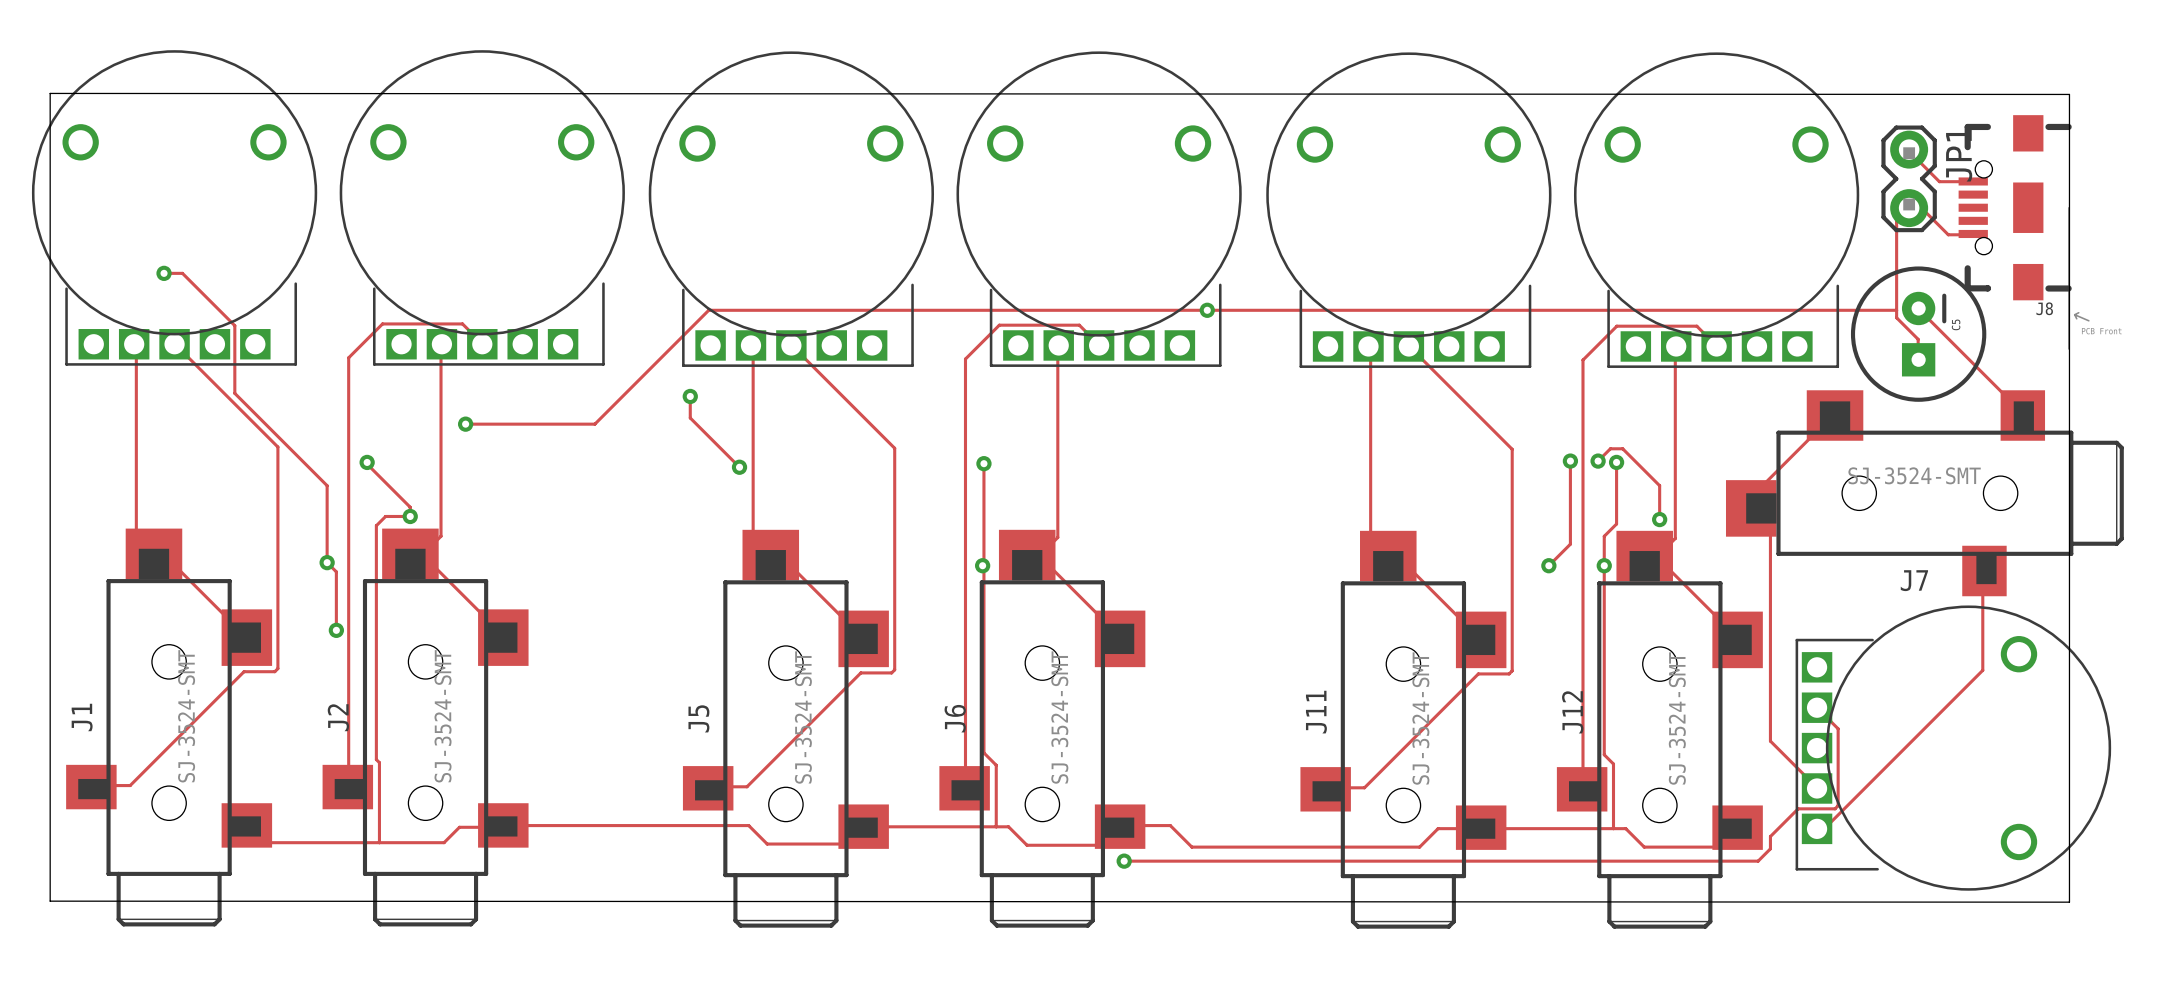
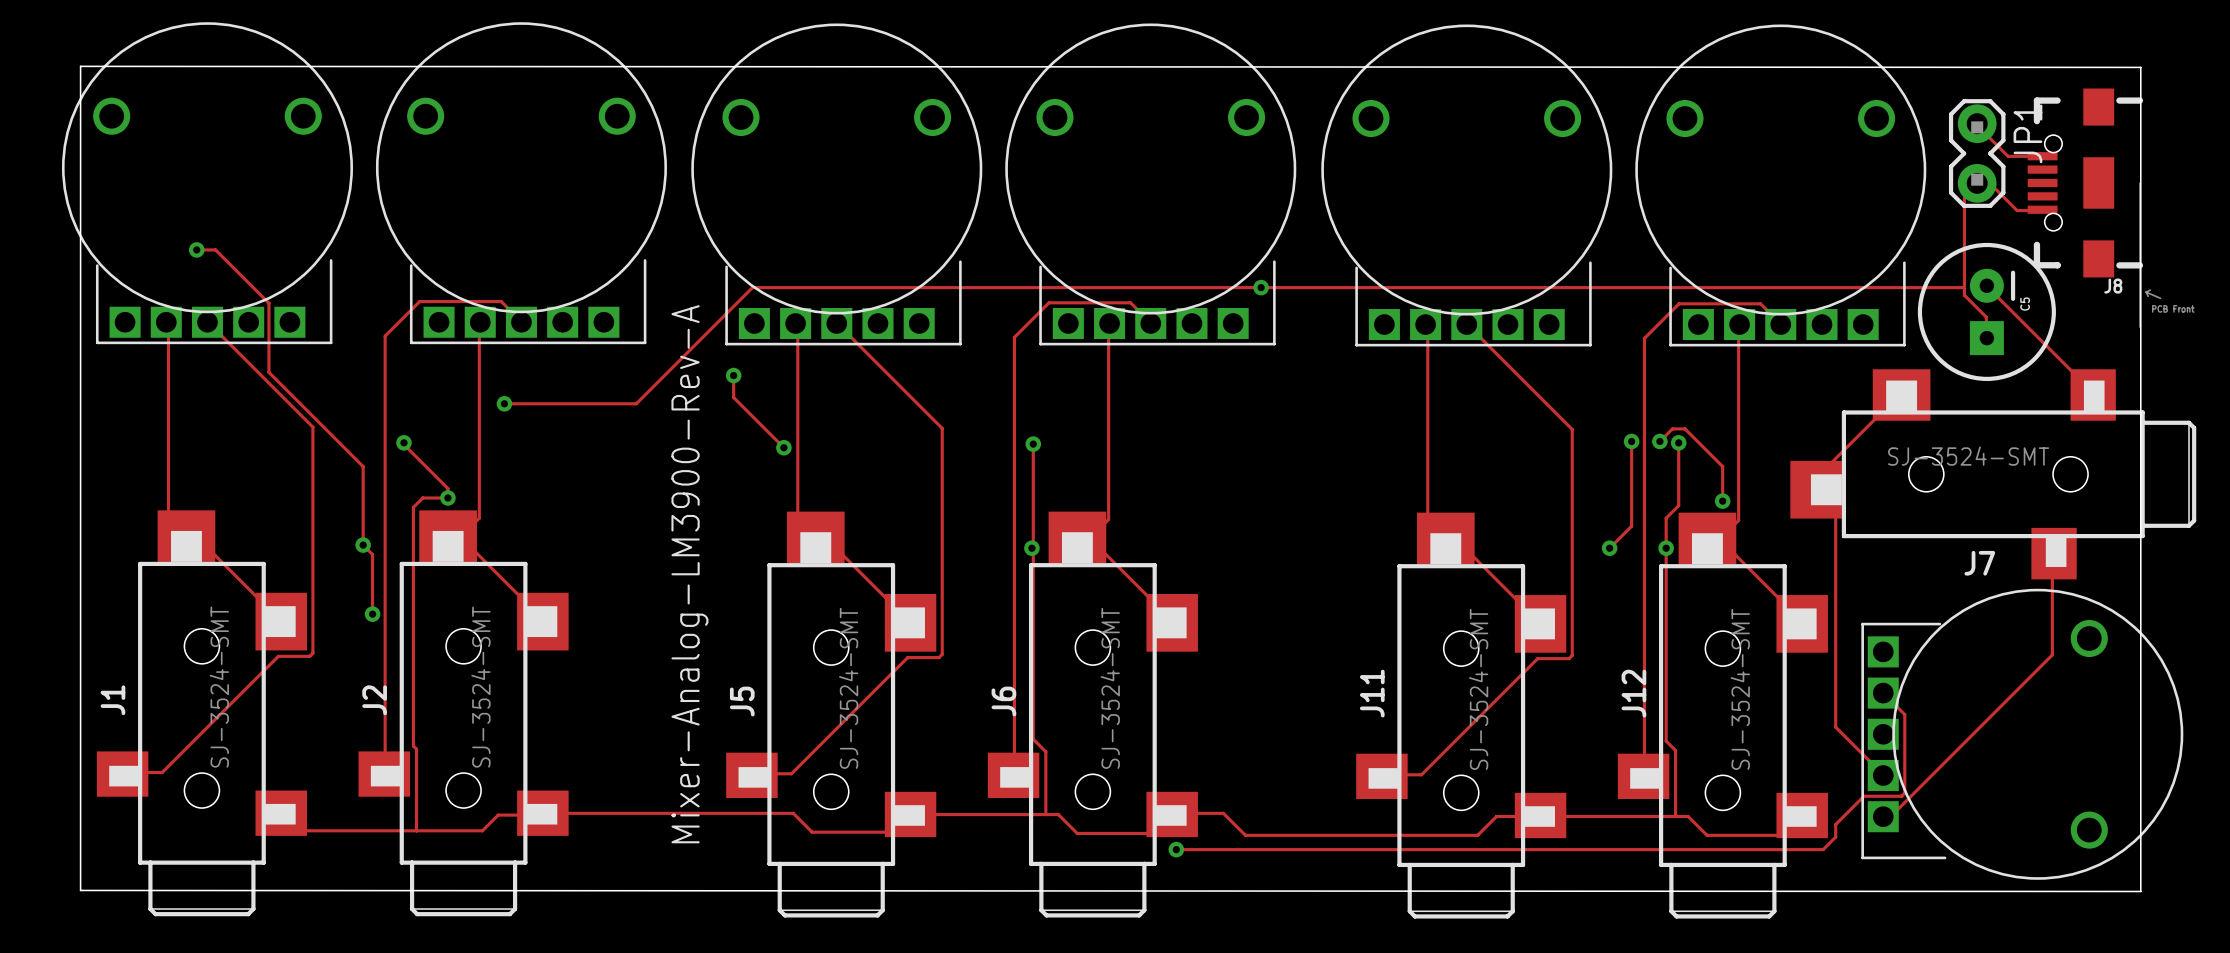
text: none -> Mixer-Analog-LM3900-Rev-A (689, 574)

